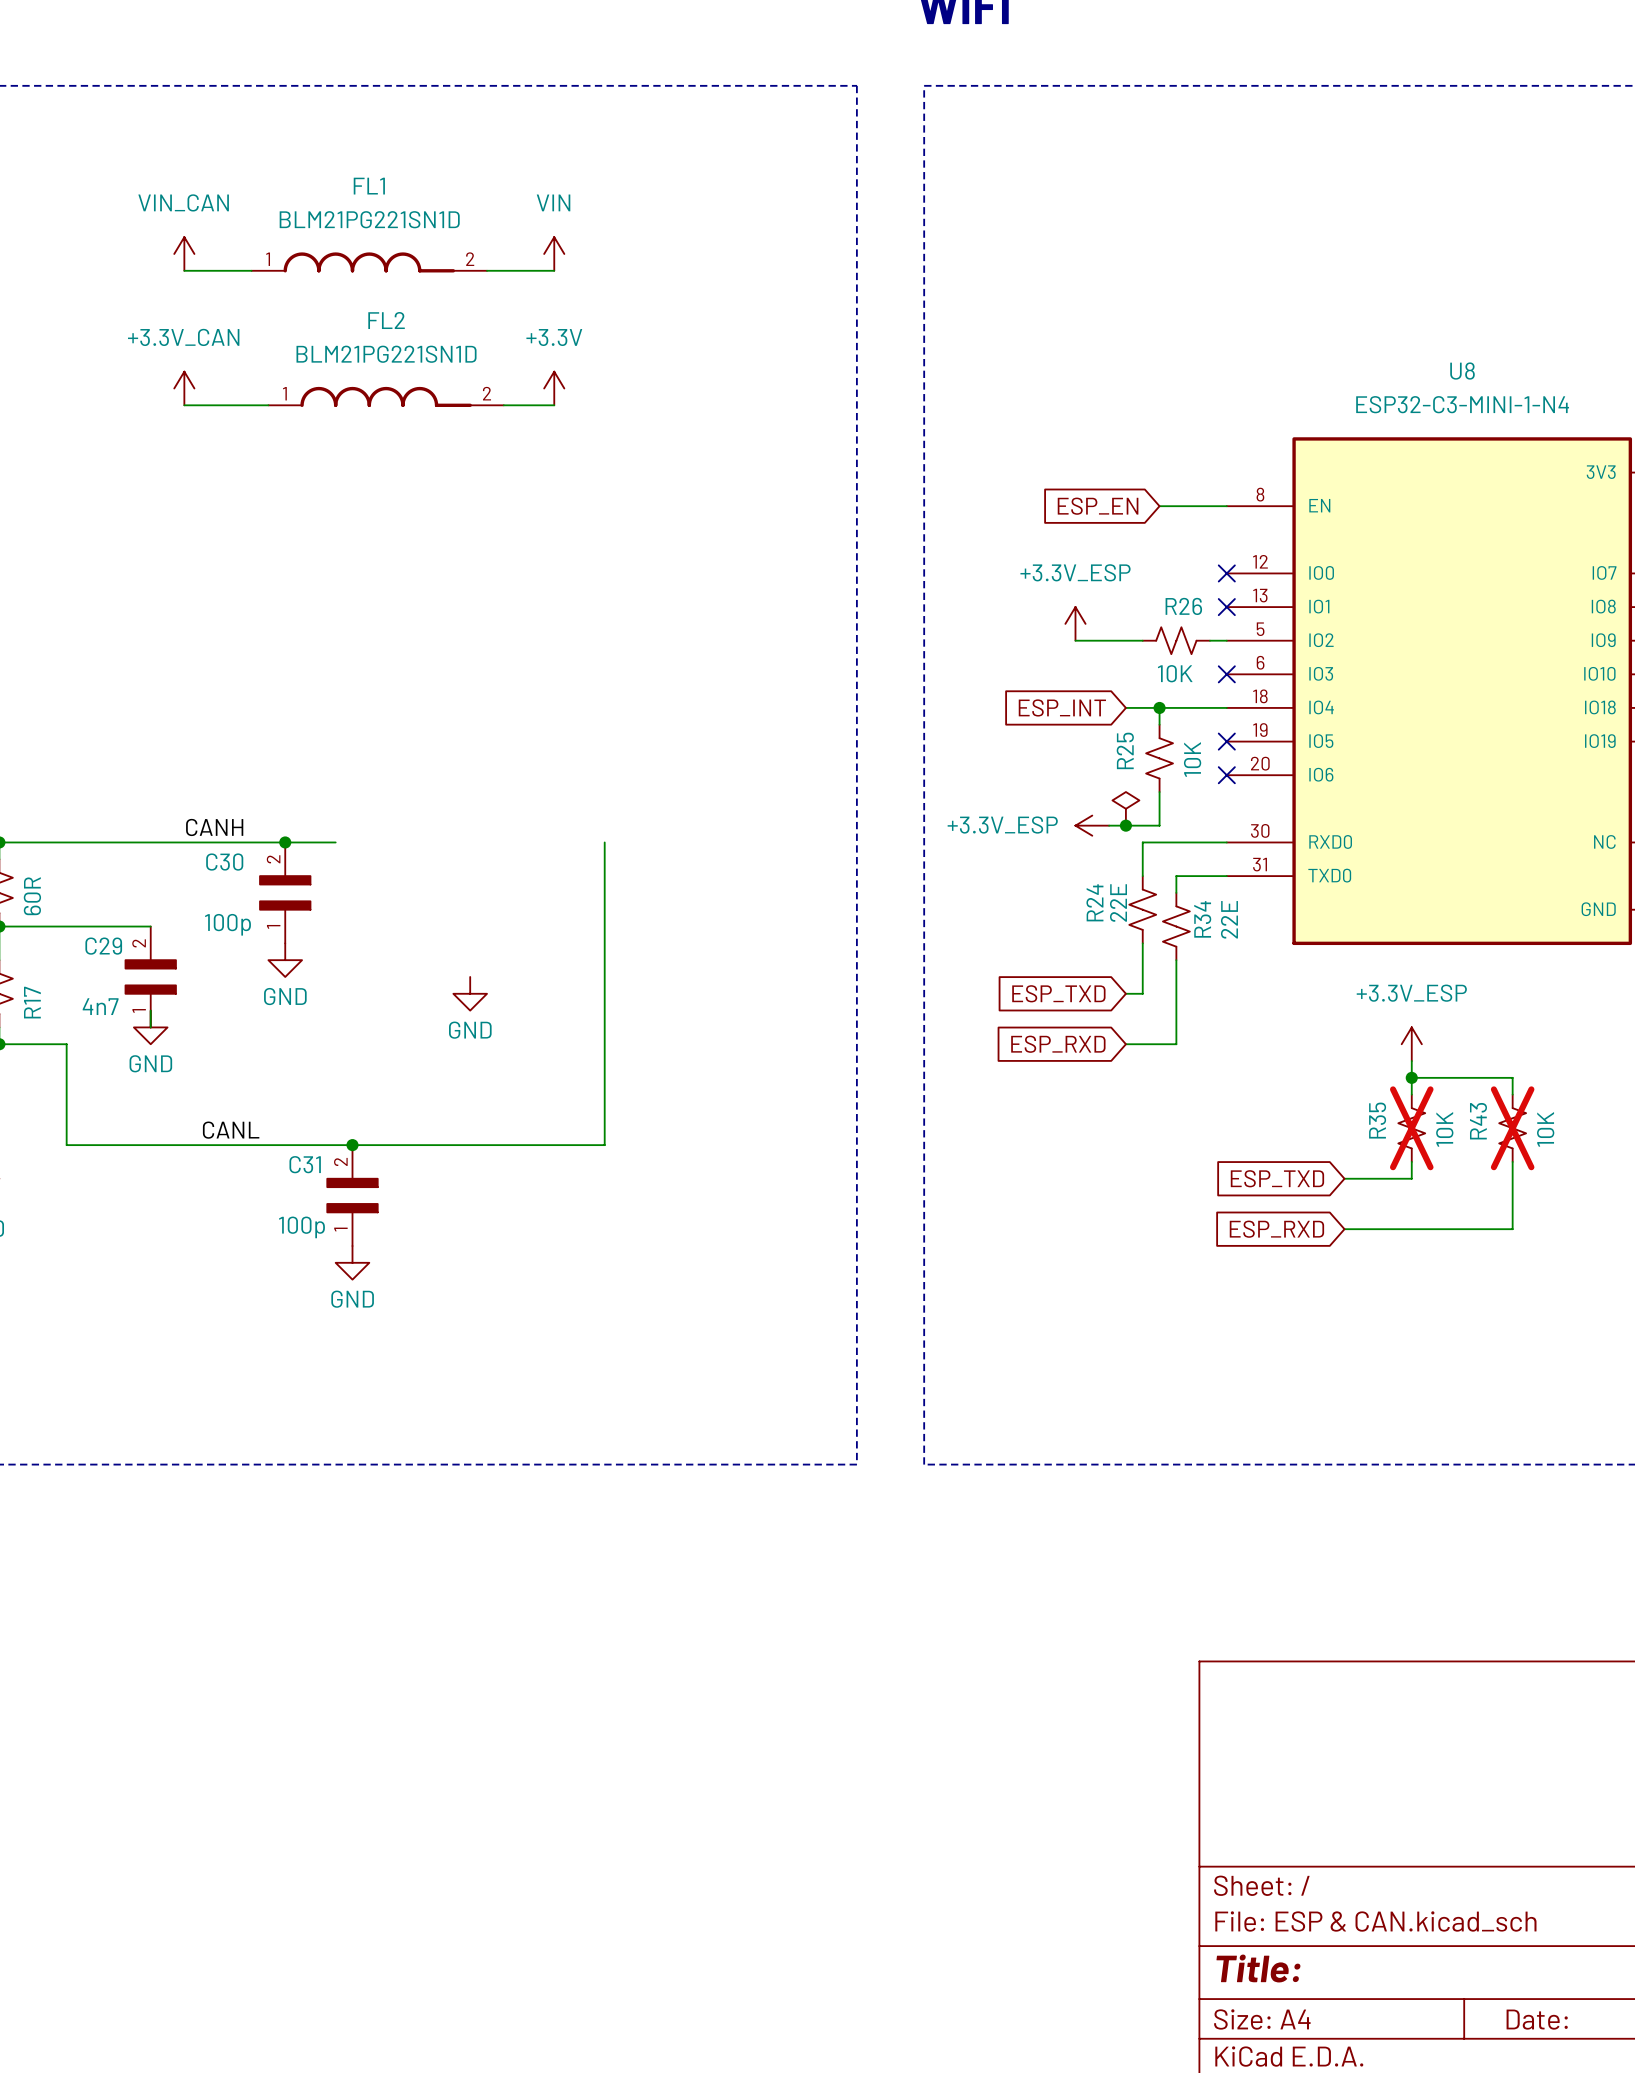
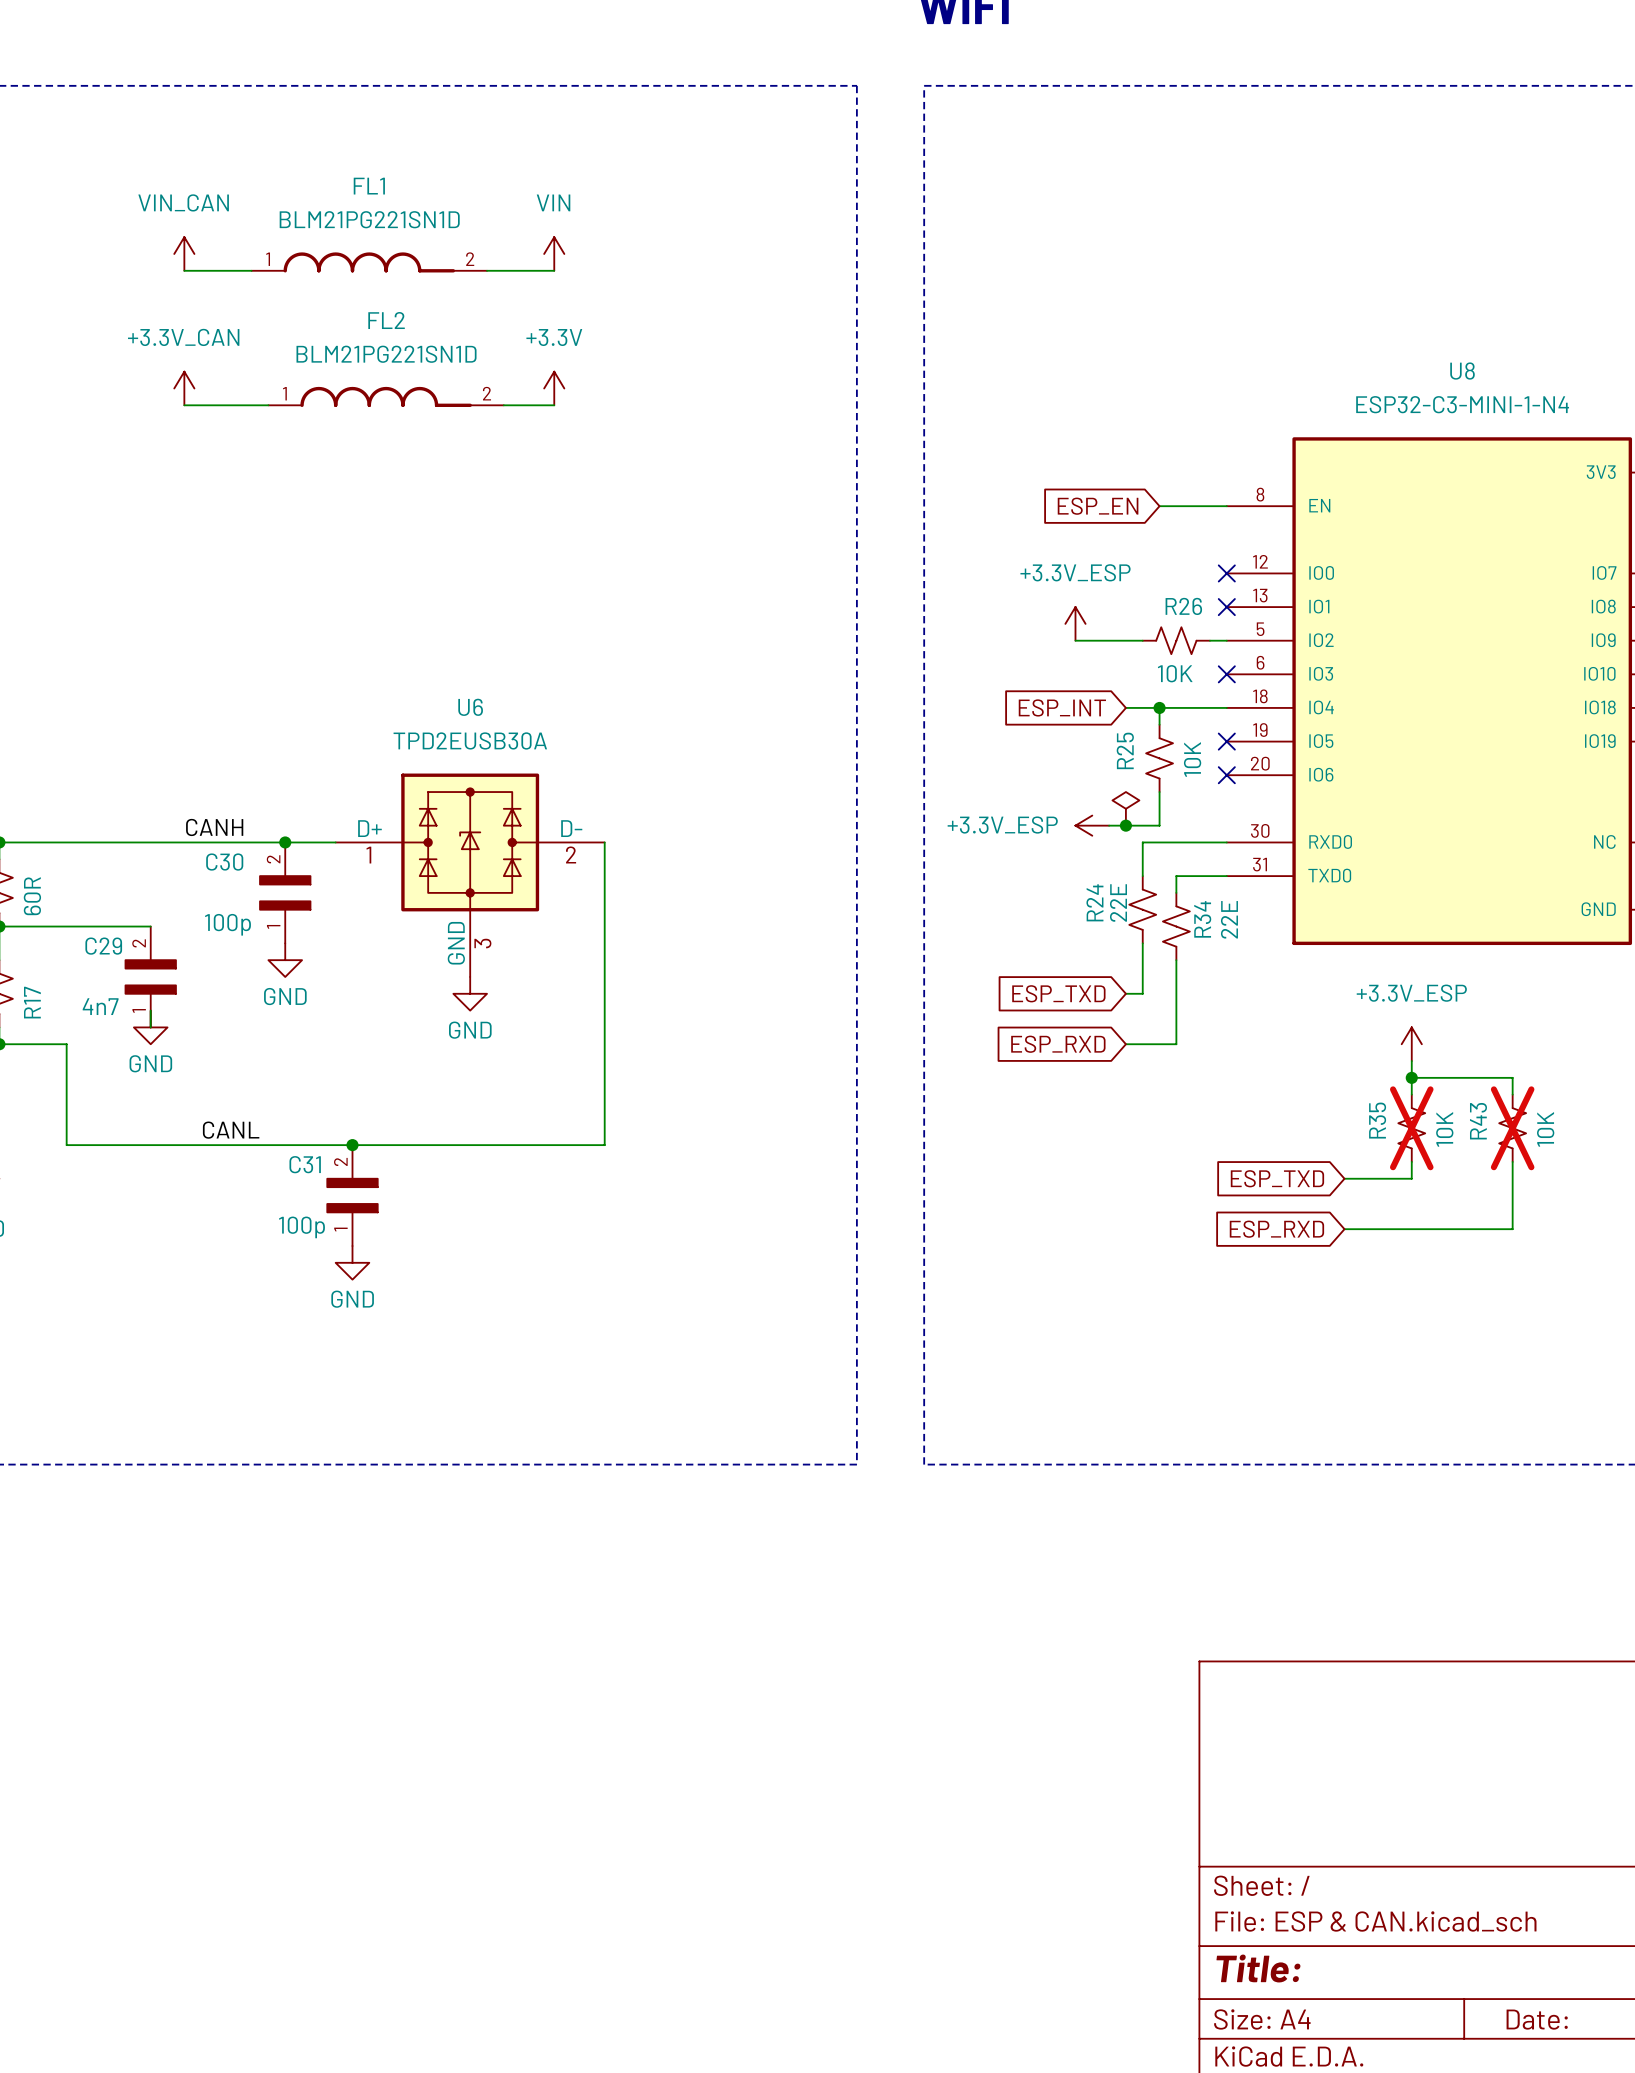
U6: none -> TPD2EUSB30A (470, 875)

